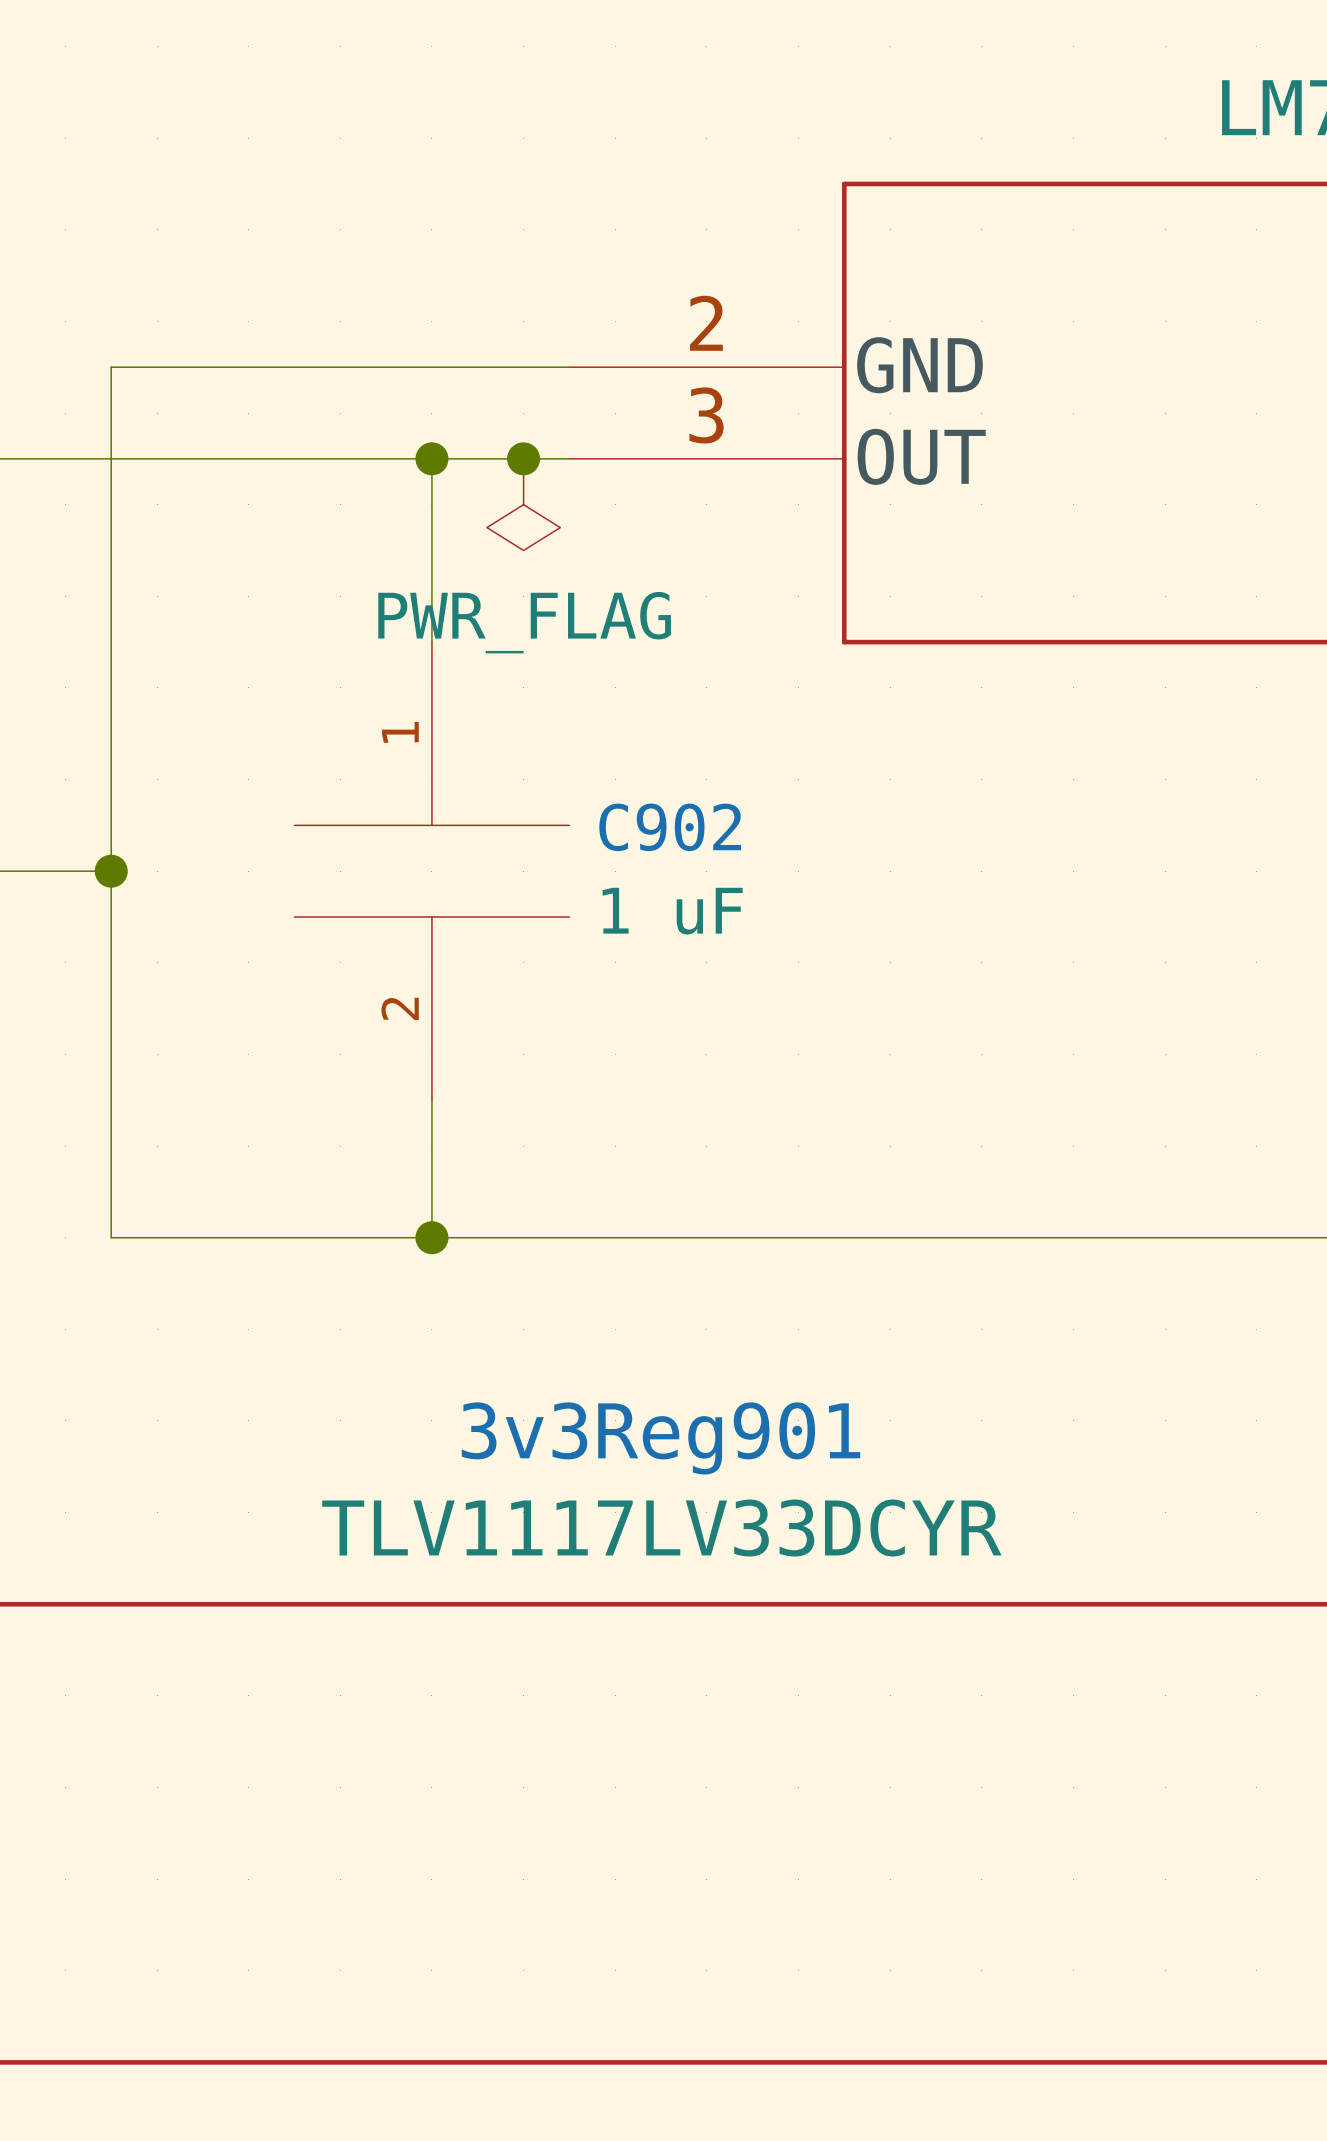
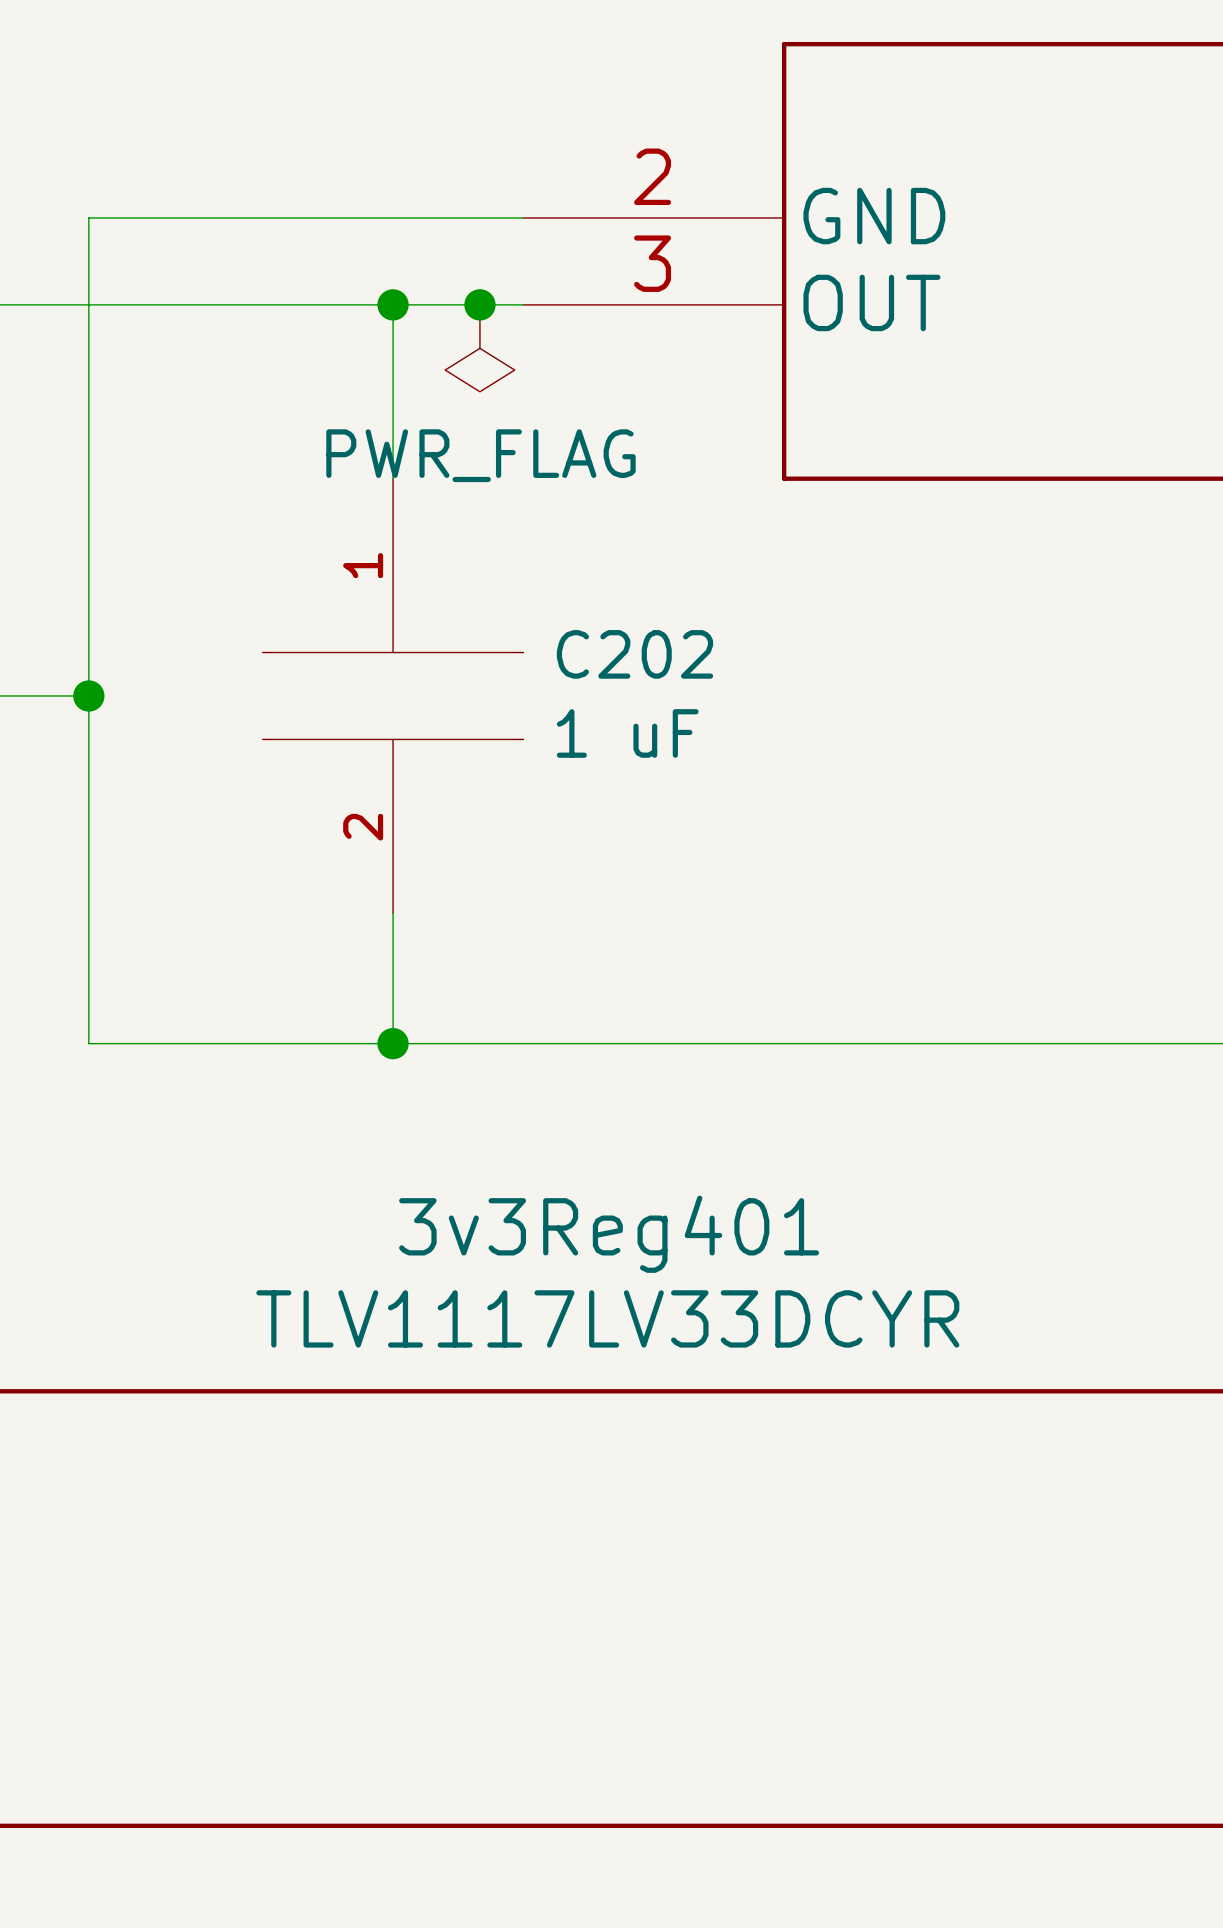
C902 name: C902 (670, 827) -> C202 (634, 654)
3v3Reg901 name: 3v3Reg901 (660, 1438) -> 3v3Reg401 (609, 1234)

